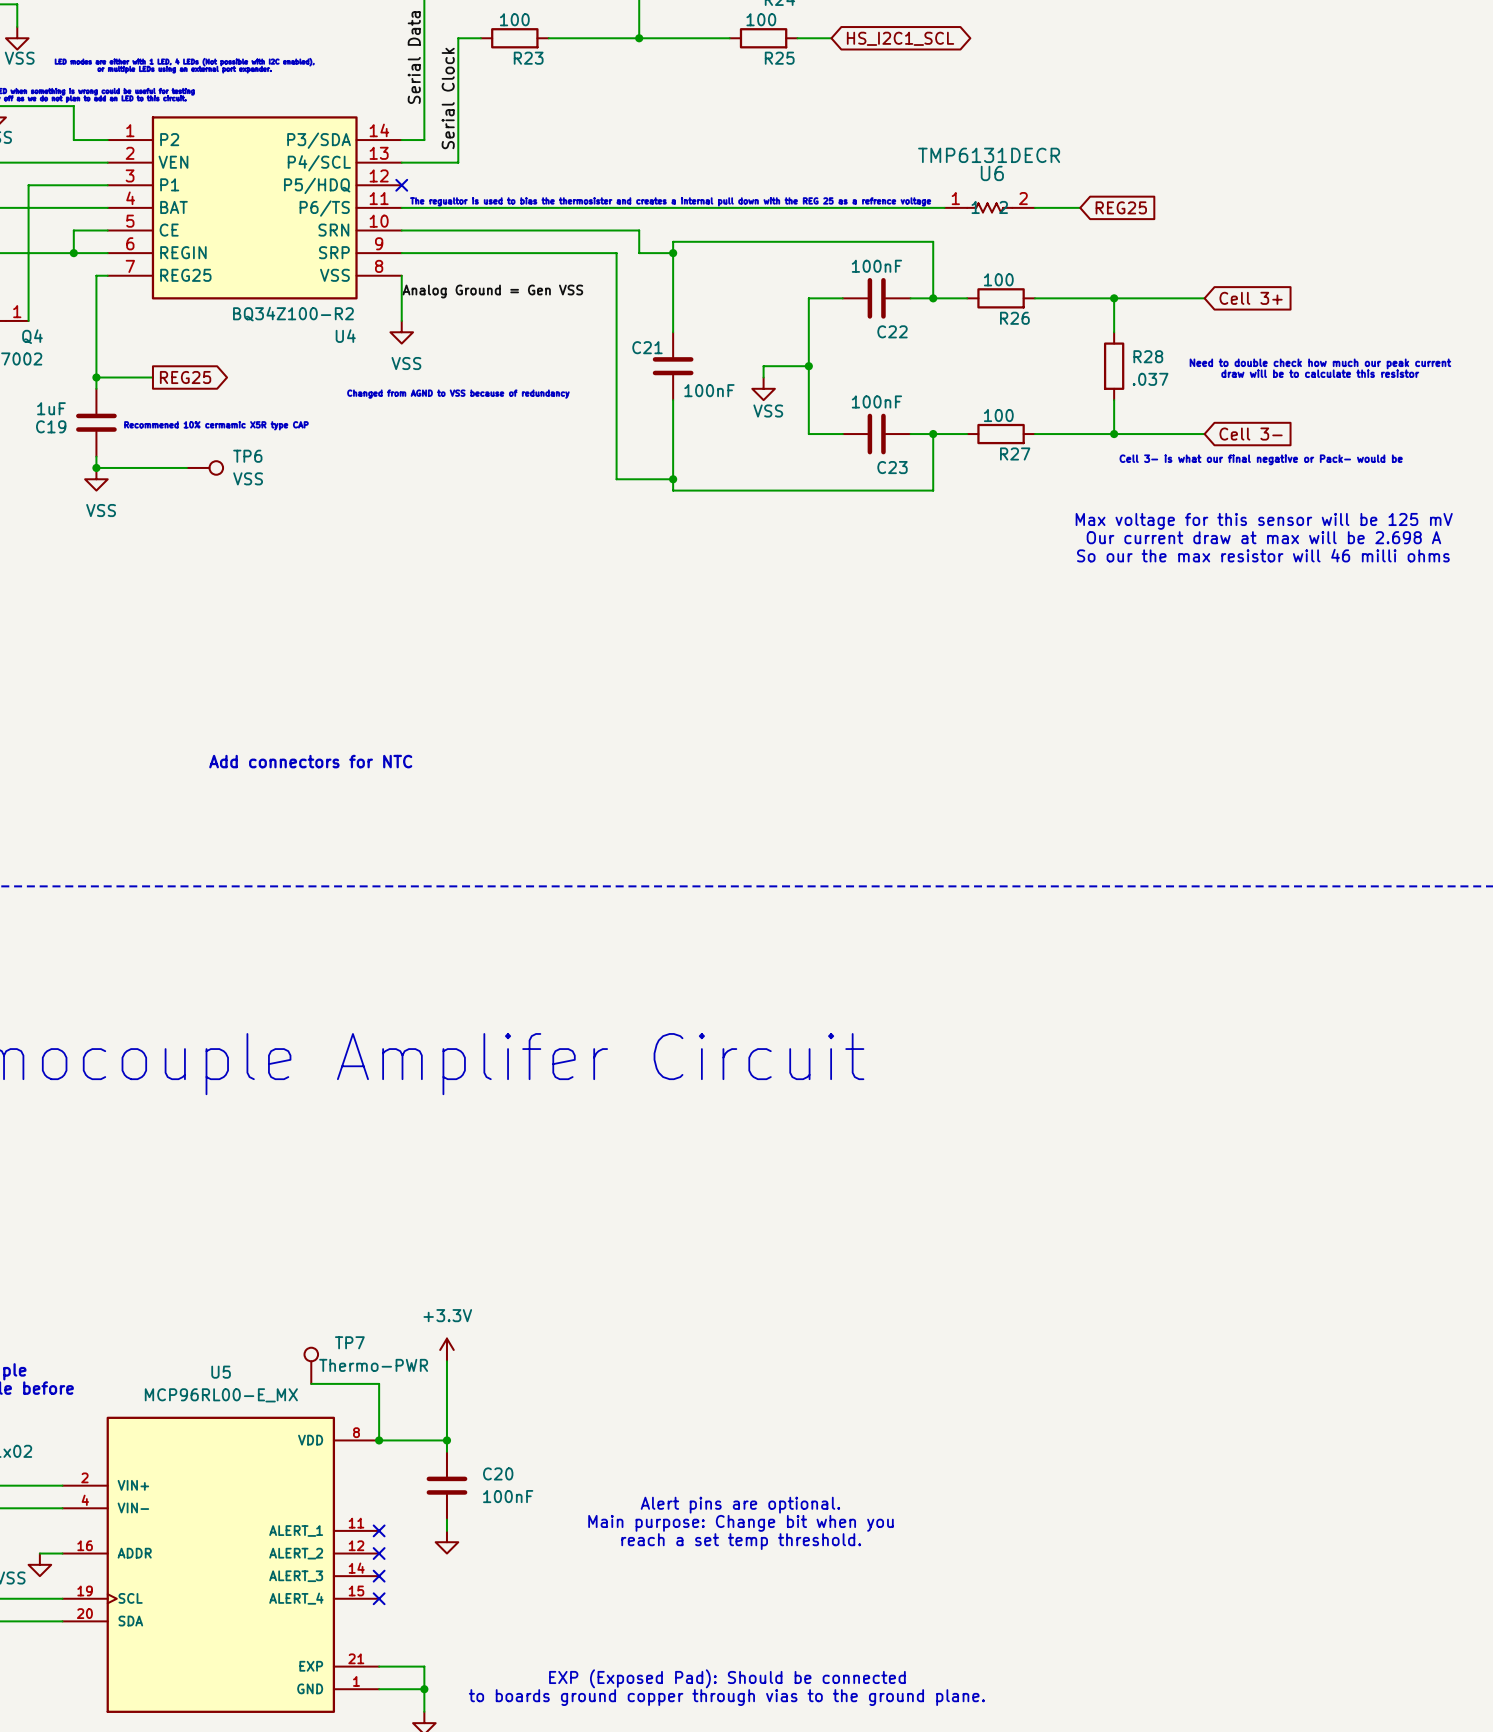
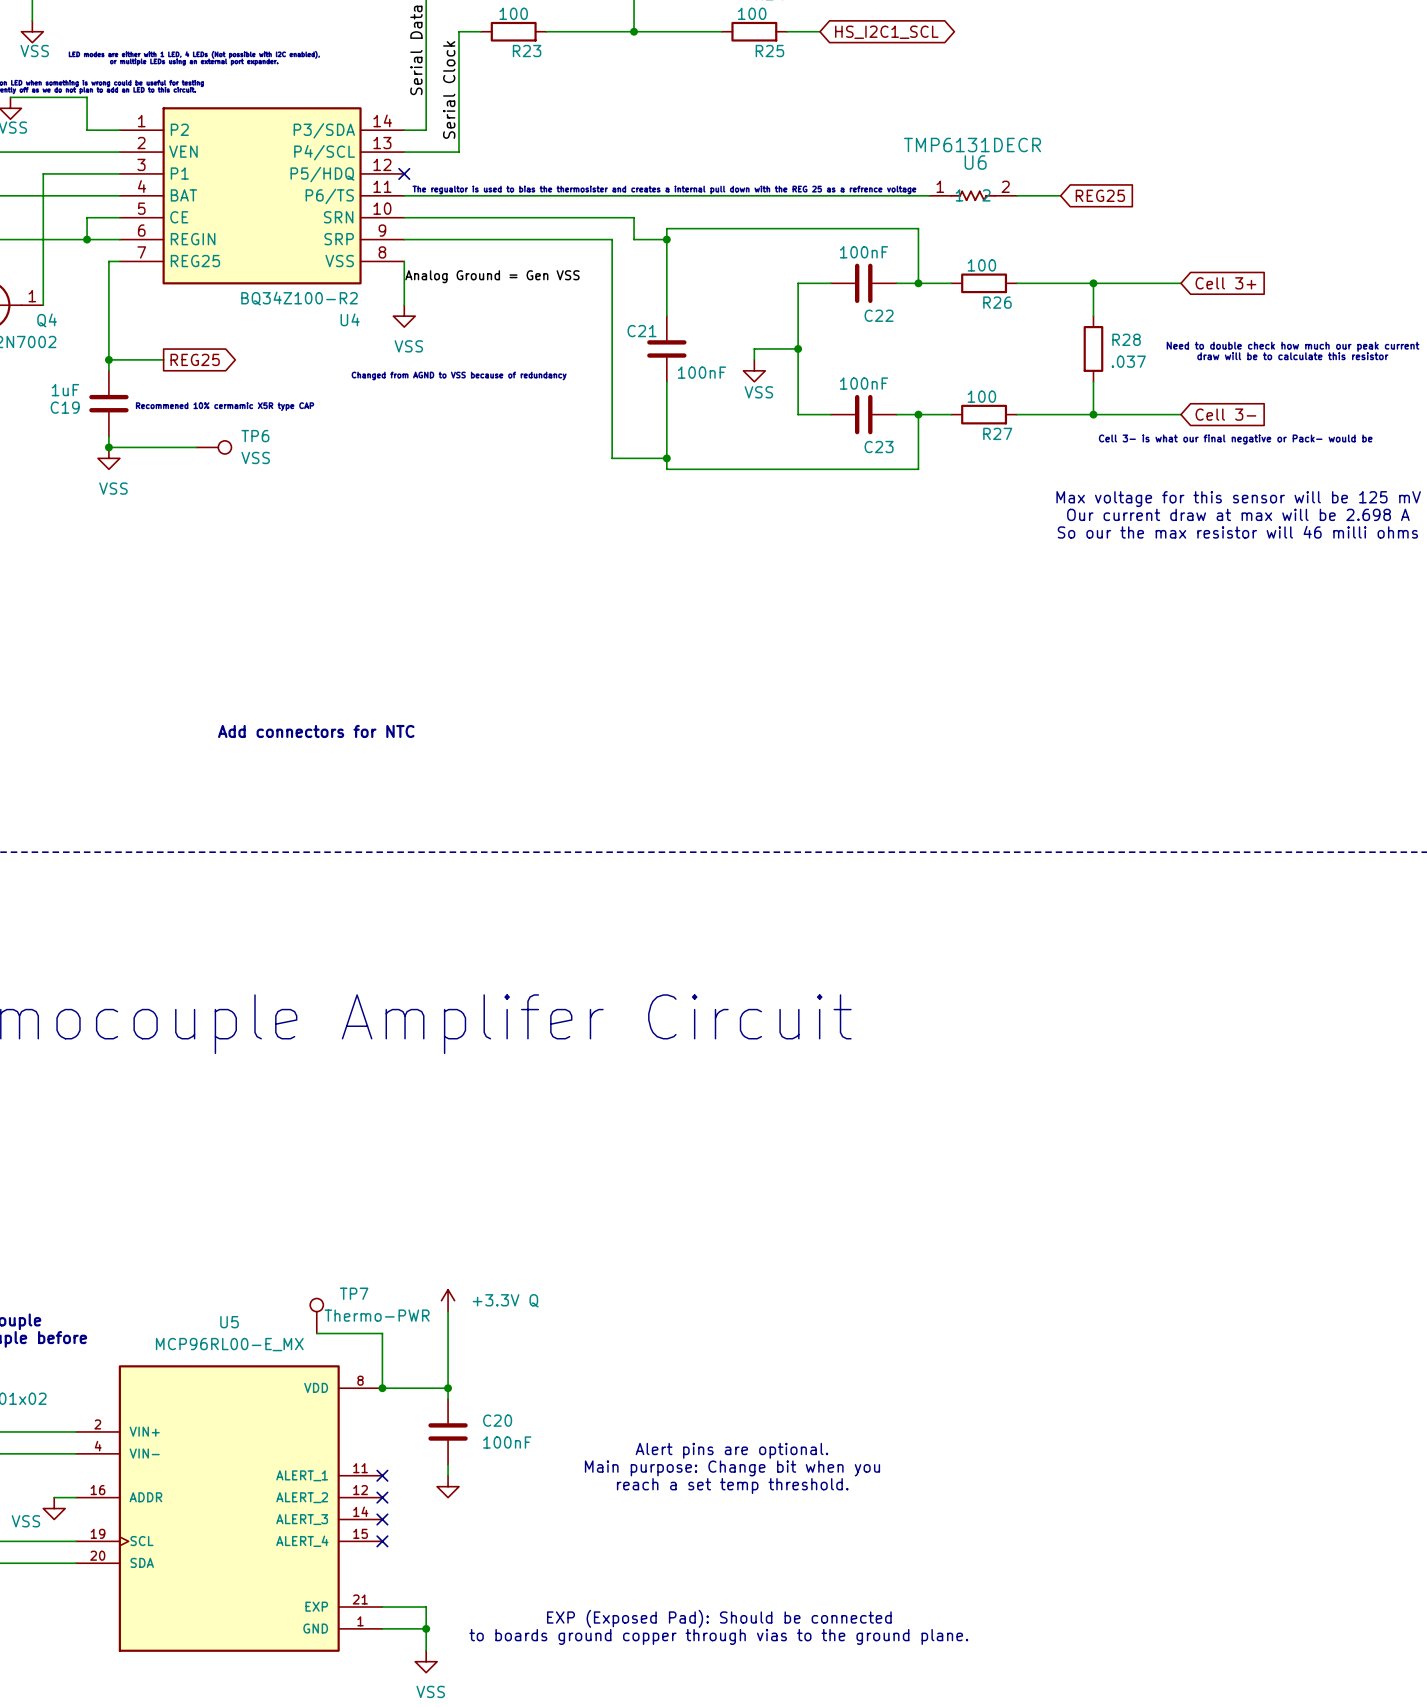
power symbol: +3.3V (446, 1349) -> +3.3V Q (448, 1300)

